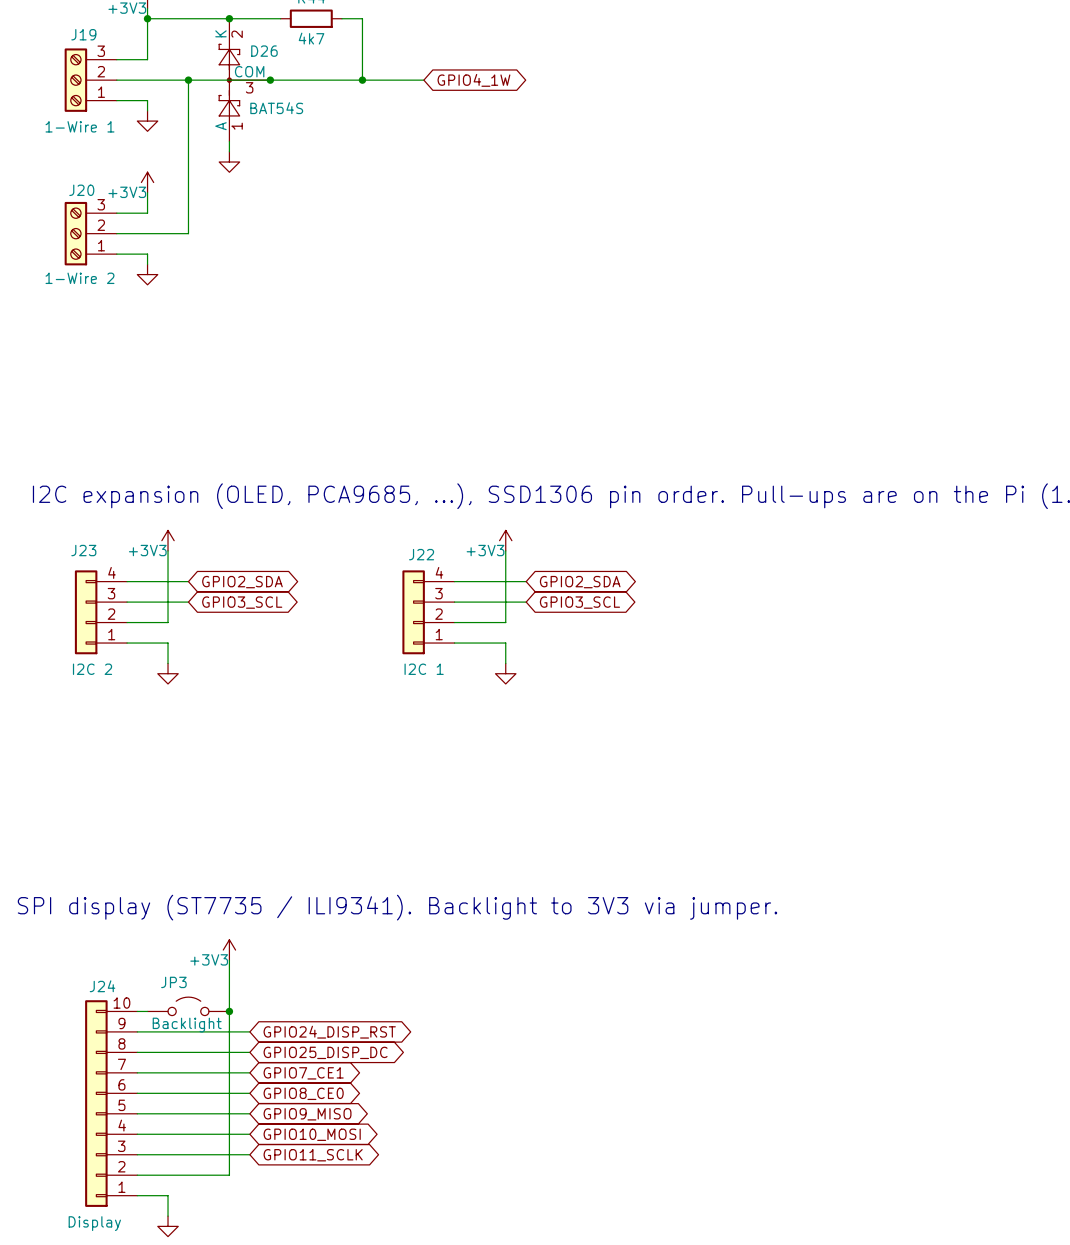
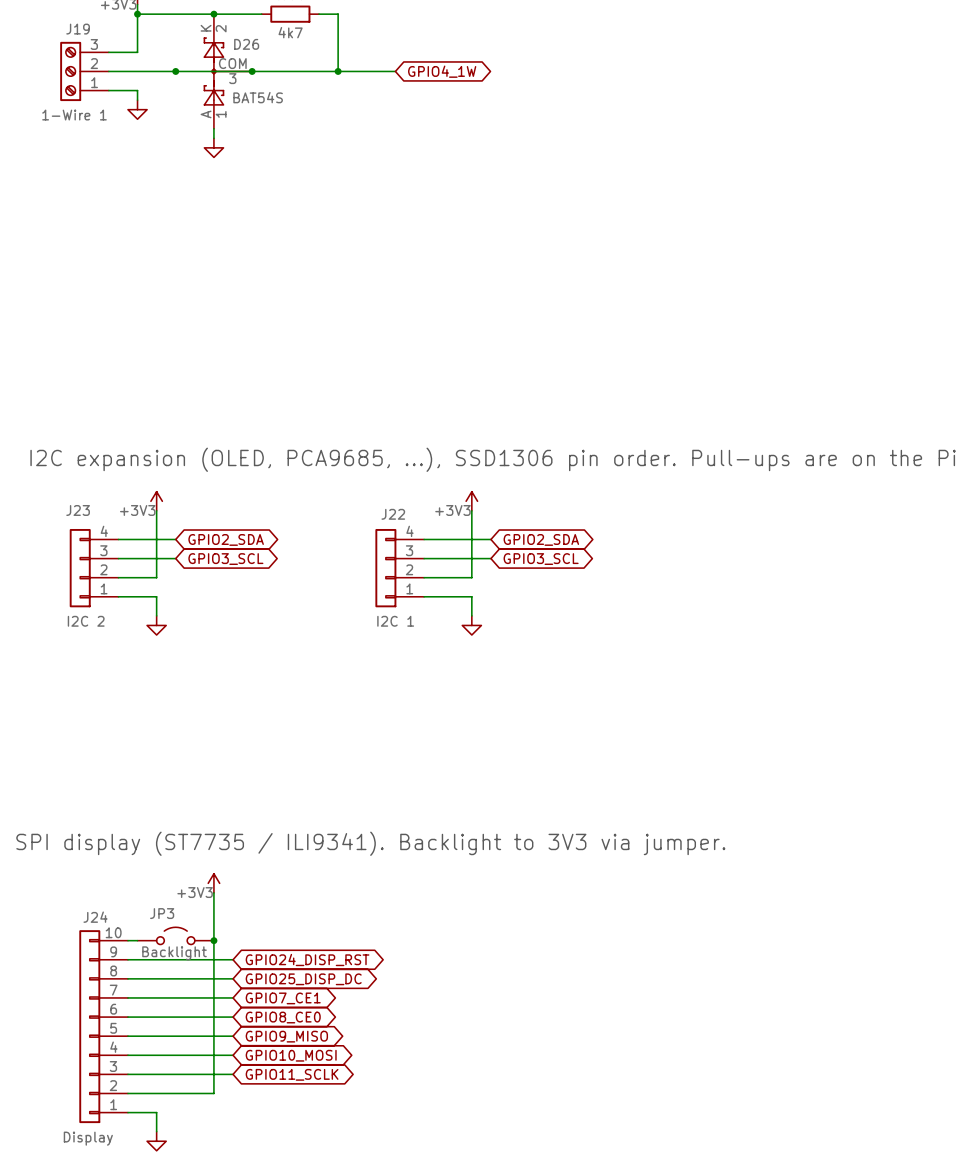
wire: (188, 80) (188, 233) (116, 233) -> none
power symbol: +3V3 (147, 182) -> none
wire: (147, 192) (147, 213) (116, 213) -> none
J20: 1-Wire 2 (90, 233) -> none
wire: (116, 254) (147, 254) (147, 264) -> none
power symbol: (147, 274) -> none

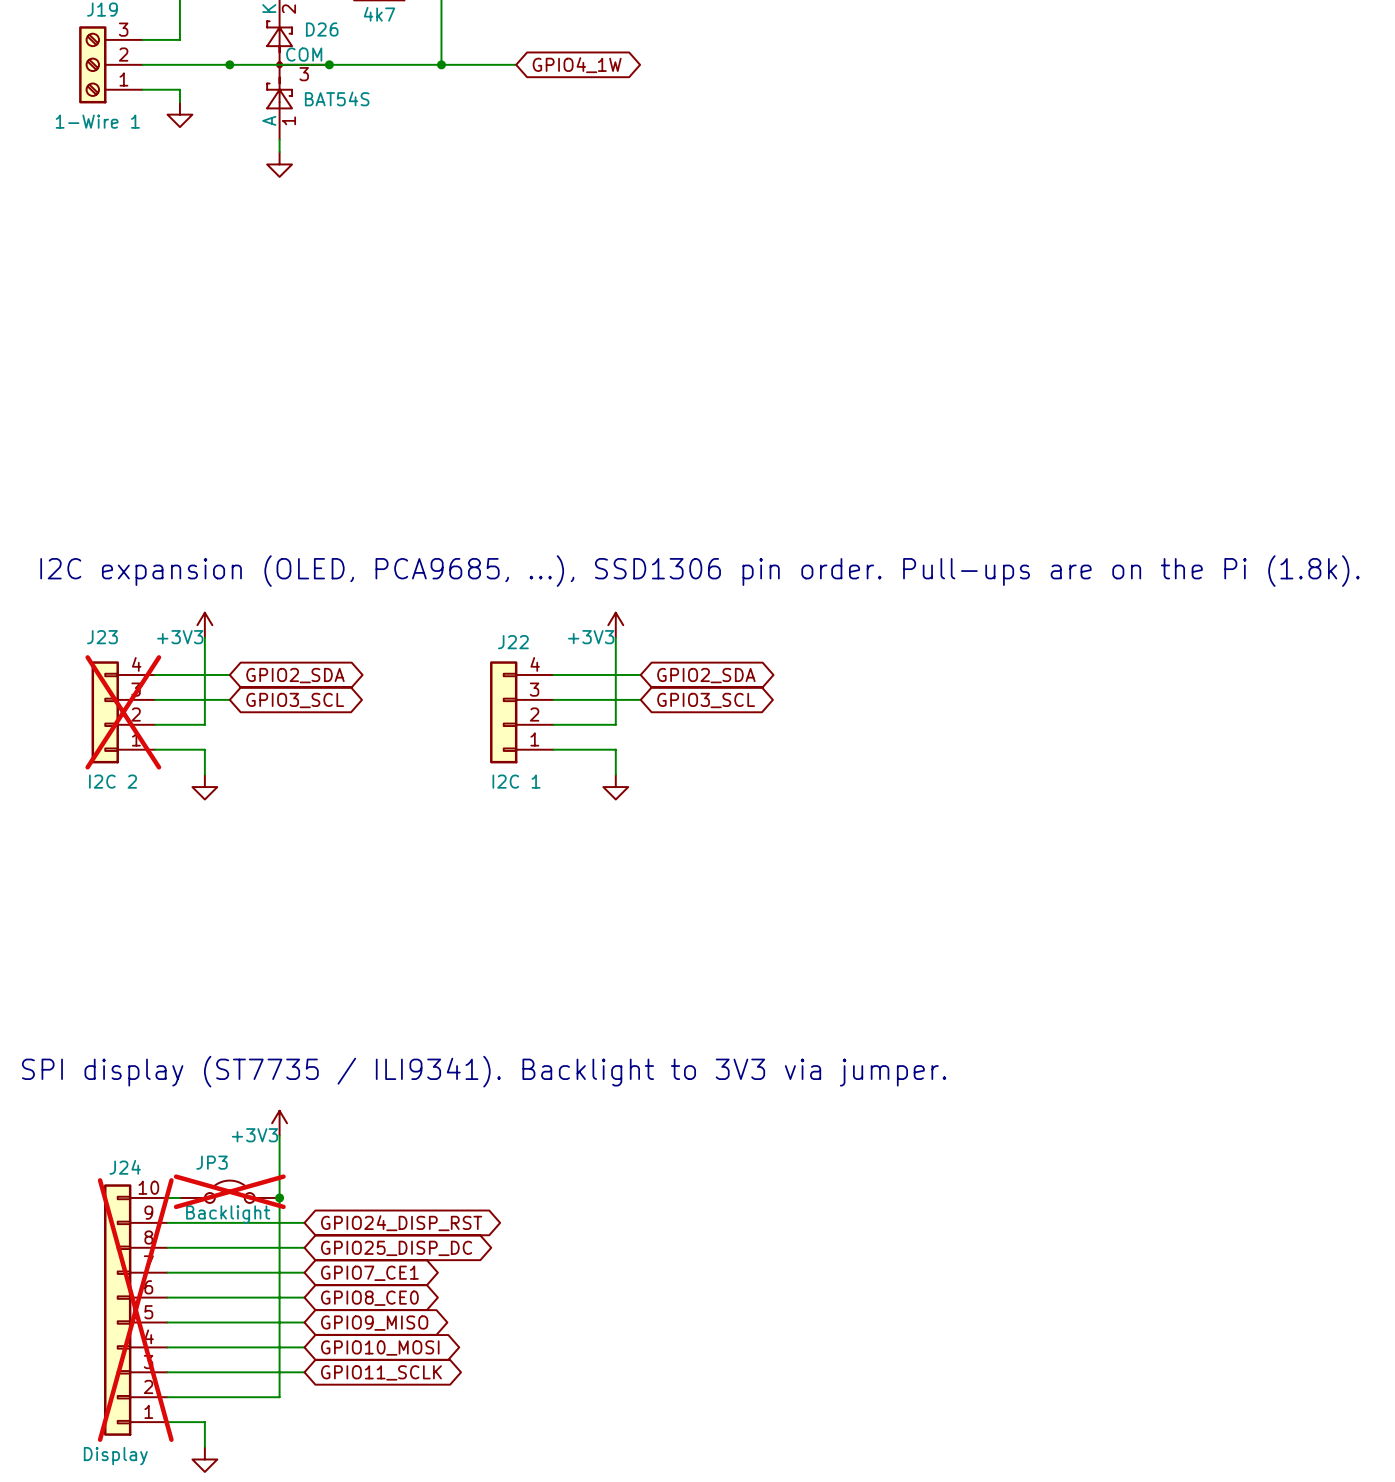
J23 do-not-place cross: none -> (123, 712)
JP3 do-not-place cross: none -> (229, 1191)
J24 do-not-place cross: none -> (135, 1310)

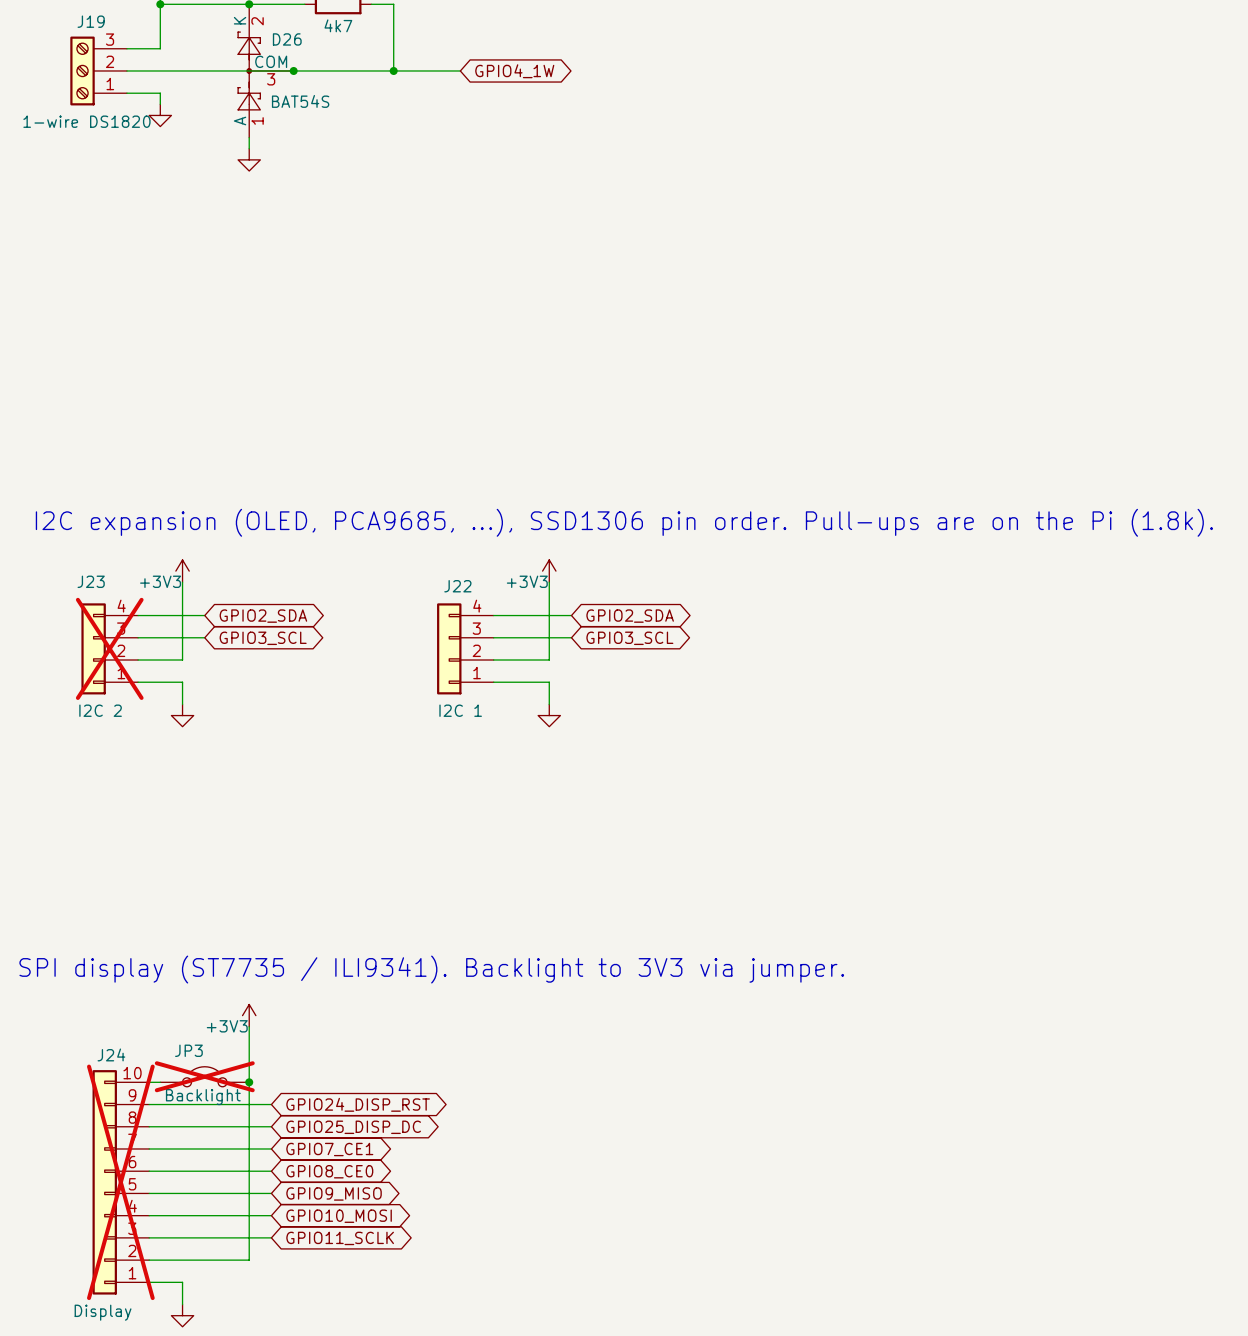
junction: (229, 64) -> none
J19 value: 1-Wire 1 (97, 121) -> 1-wire DS1820 (86, 121)

